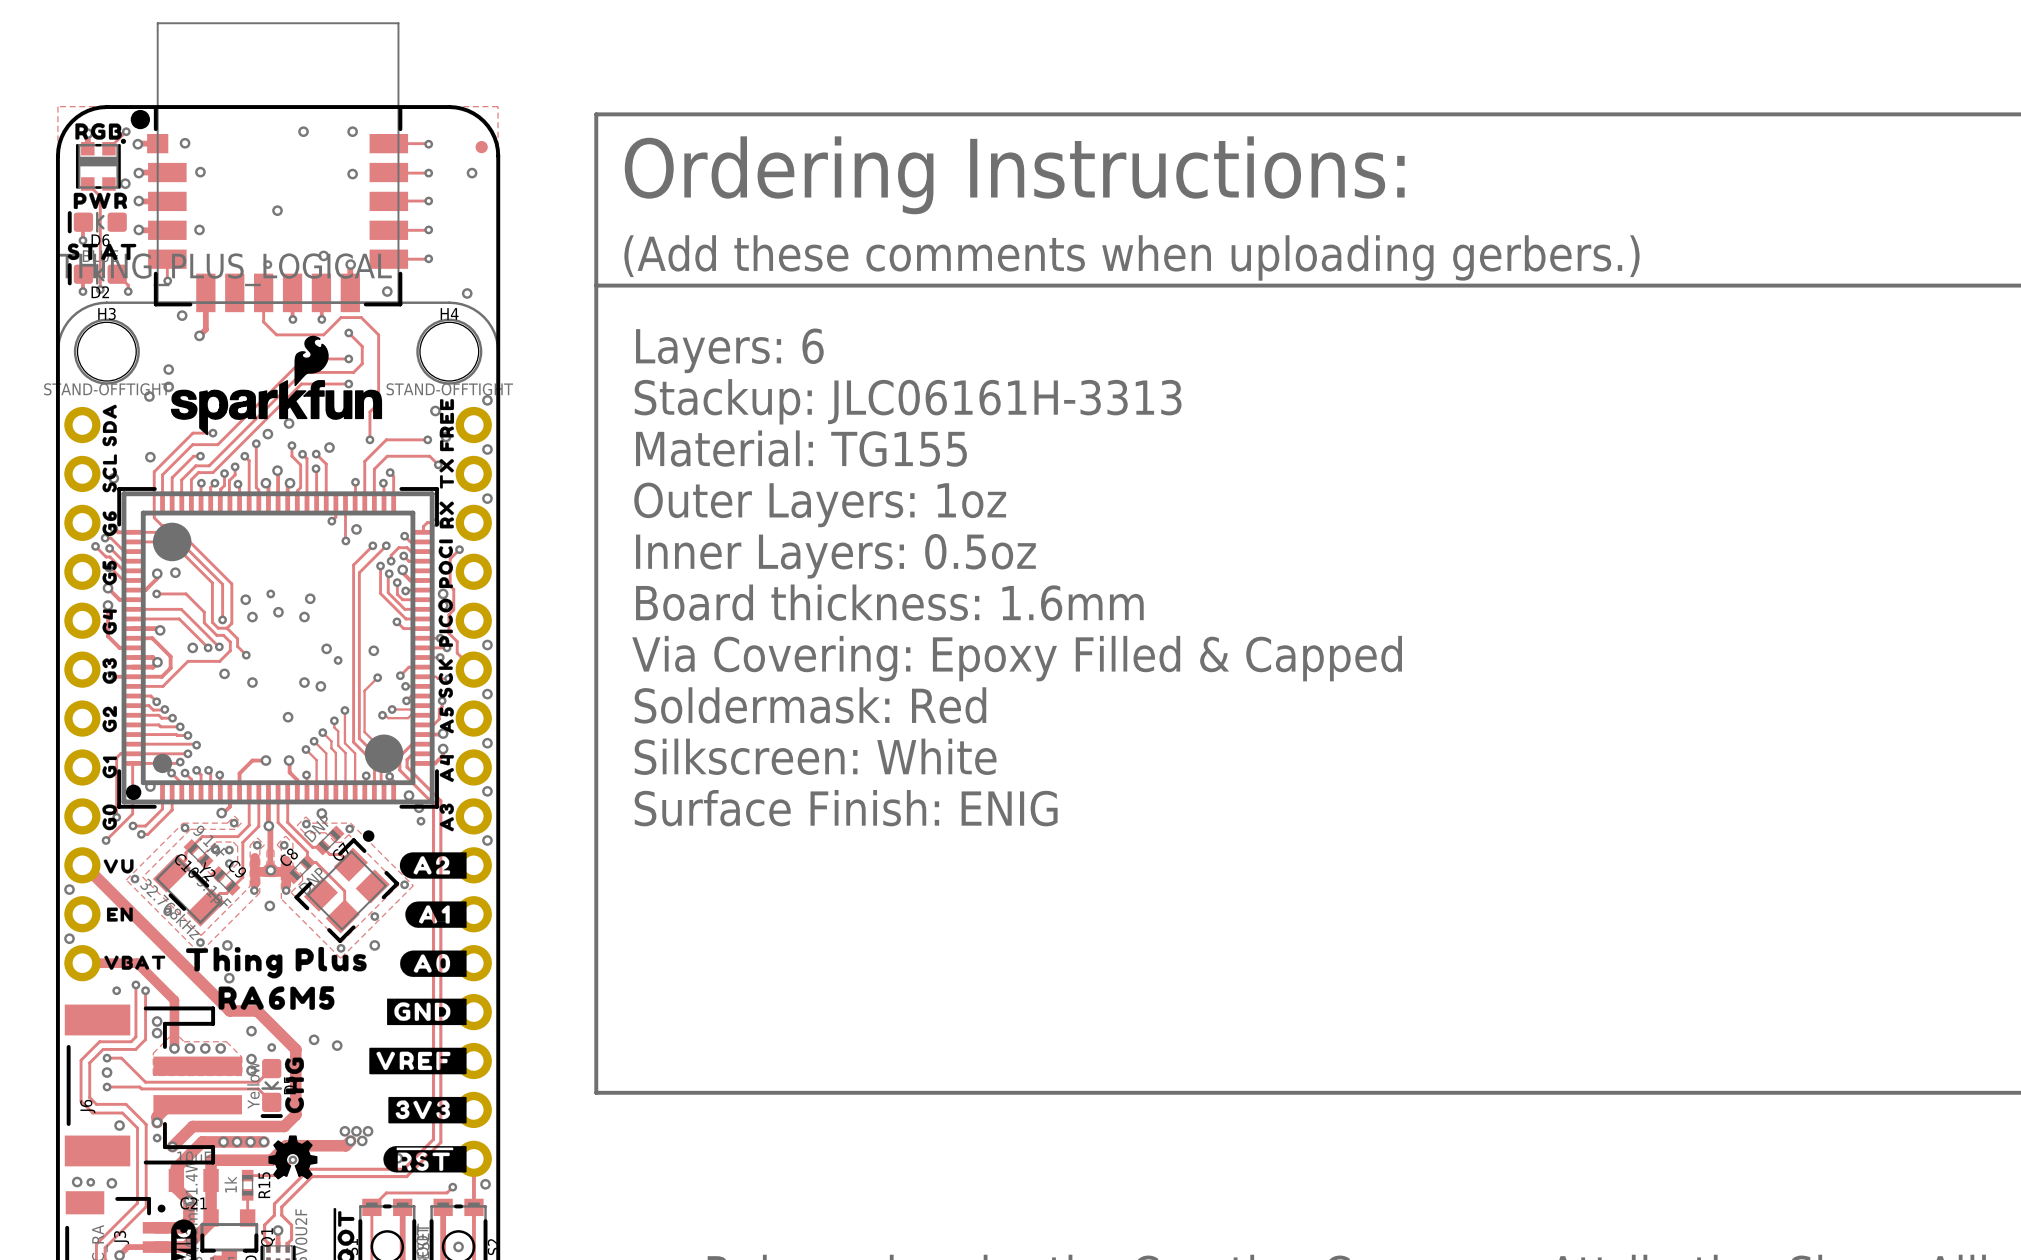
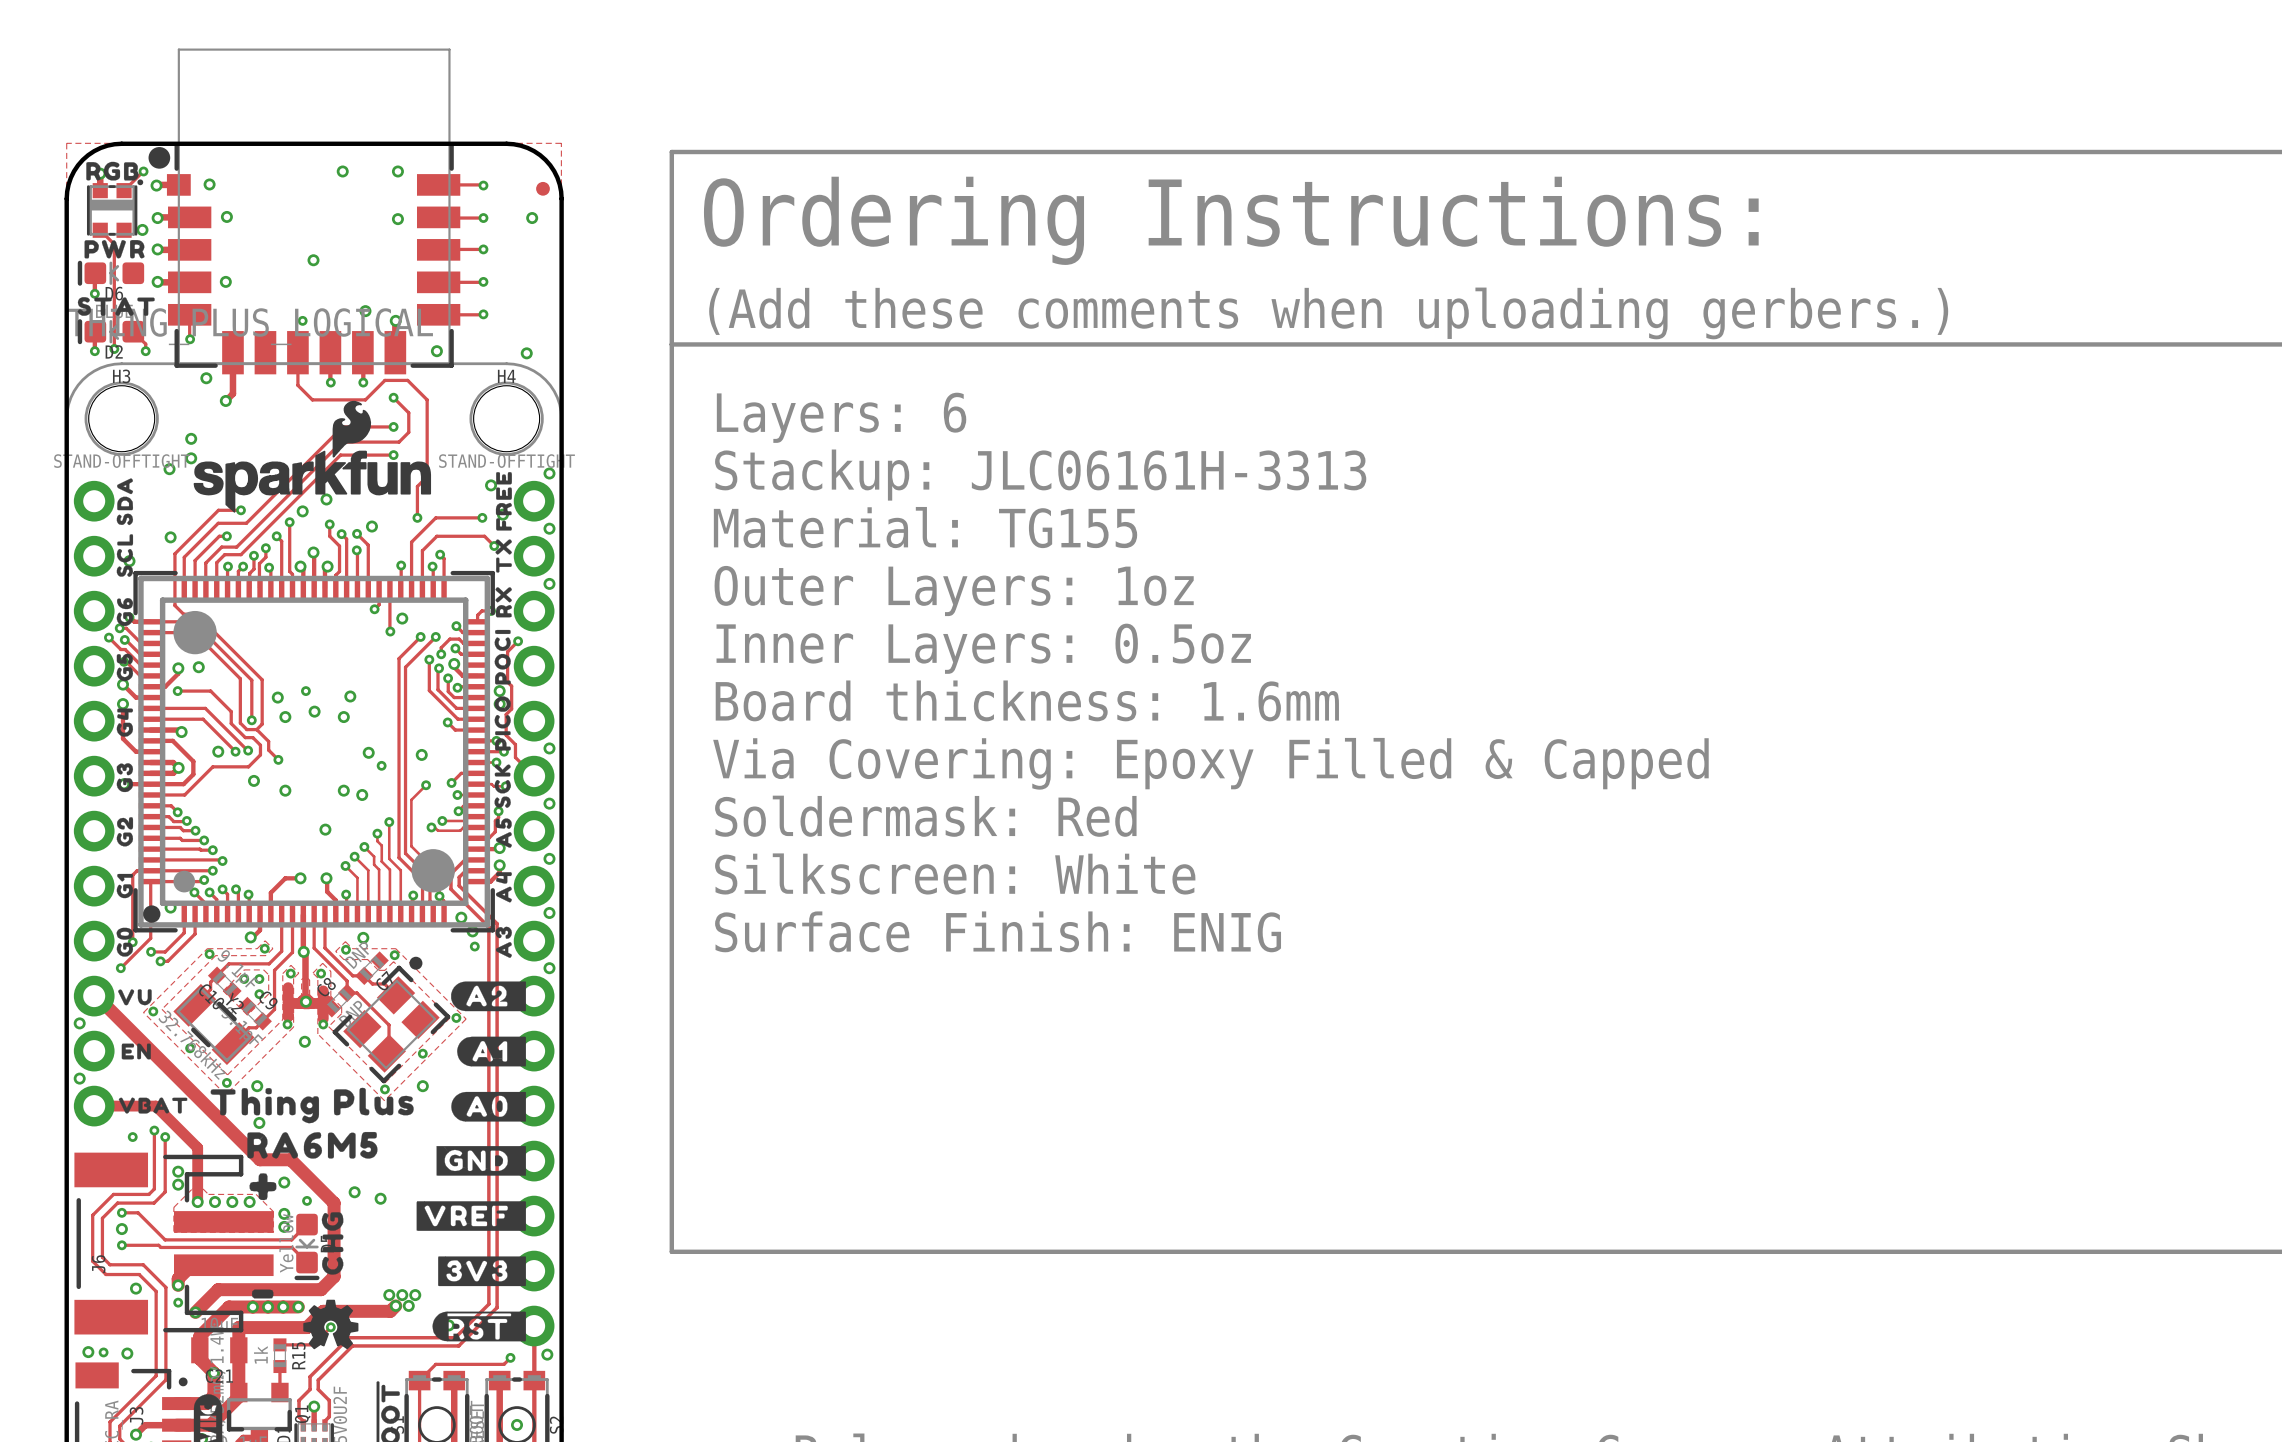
drawing: none -> [249, 1173, 277, 1201]
drawing: none -> [251, 1289, 274, 1299]

